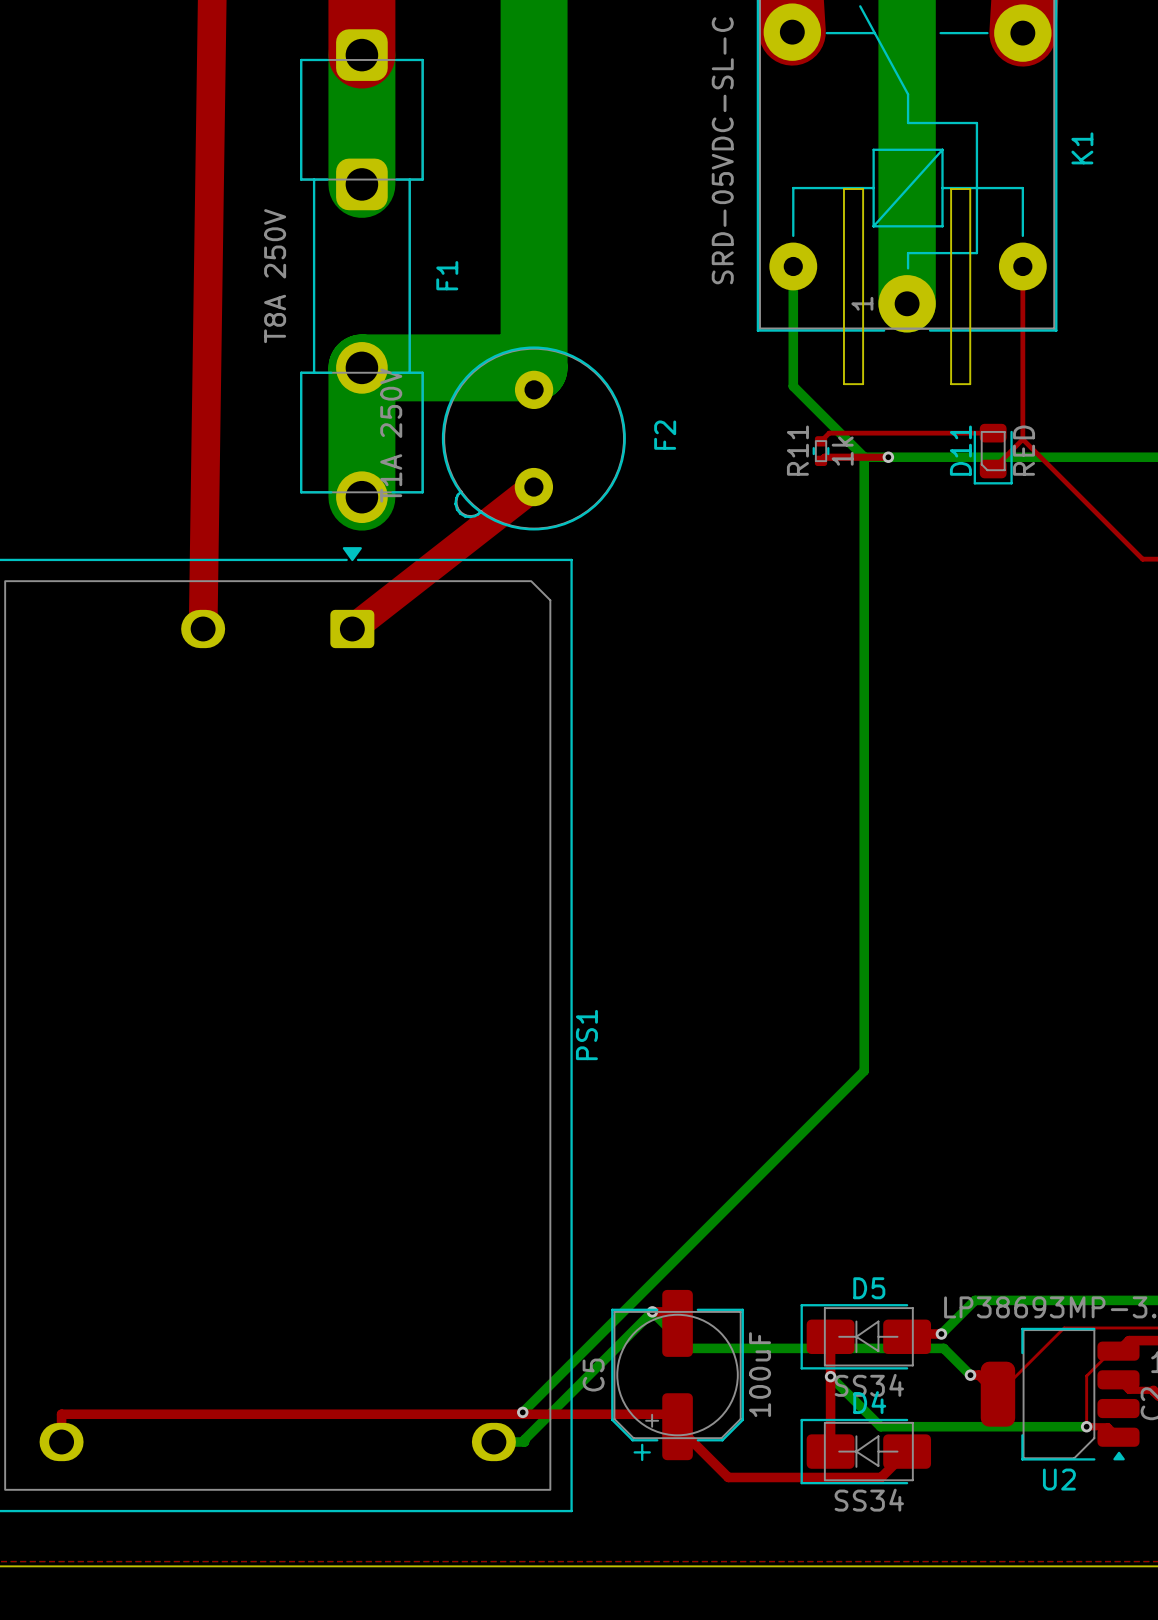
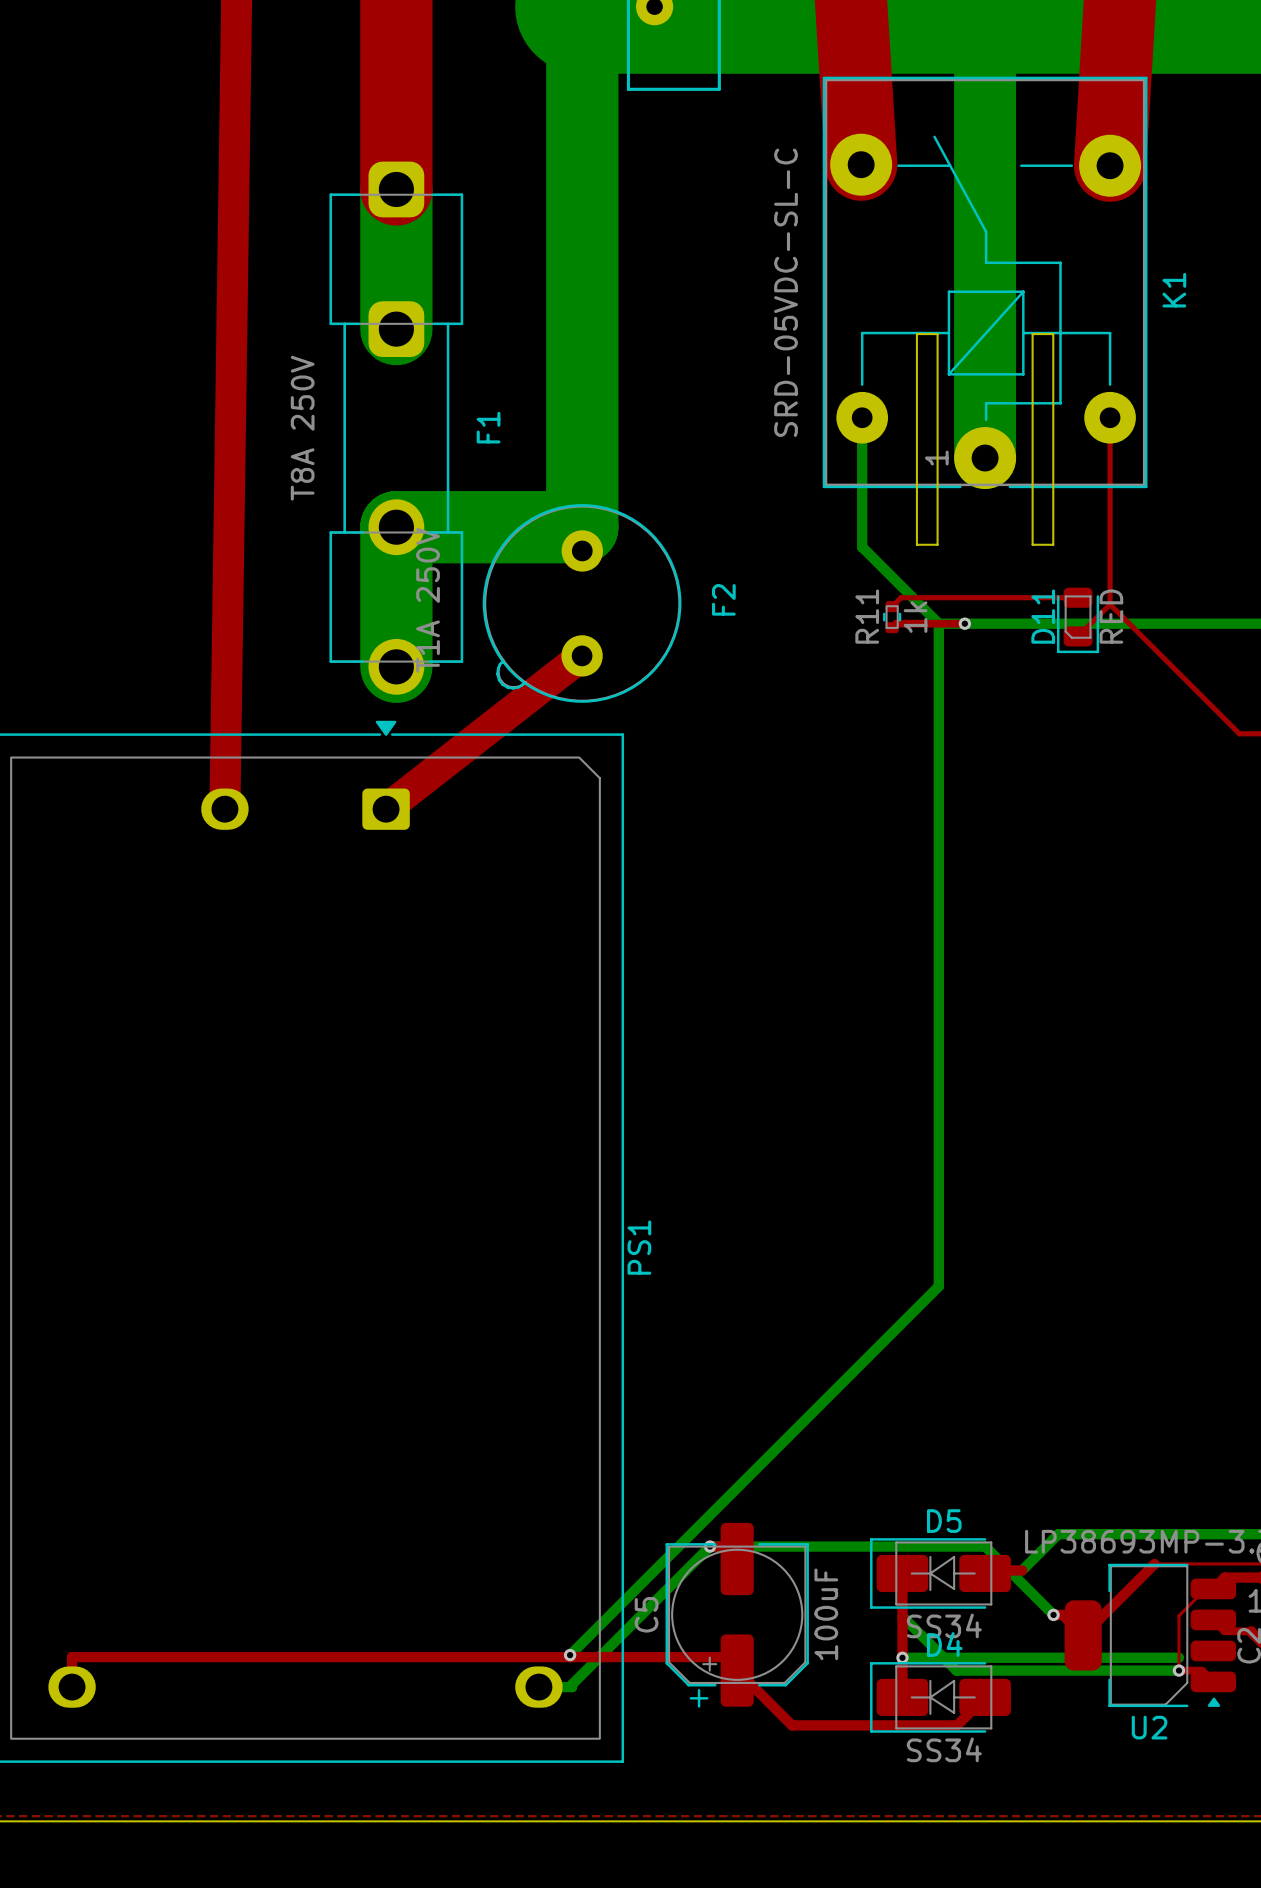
bottom track: (652, 1311) (688, 1348) (943, 1348) -> (710, 1546) (985, 1546) (1024, 1586)
top track width: thin (1064, 1327) (997, 1394) -> thick (1154, 1563) (1083, 1635)
via: (941, 1334) -> none
via position: (830, 1376) -> (902, 1657)
bottom track: none -> (902, 1657) (1178, 1657)

